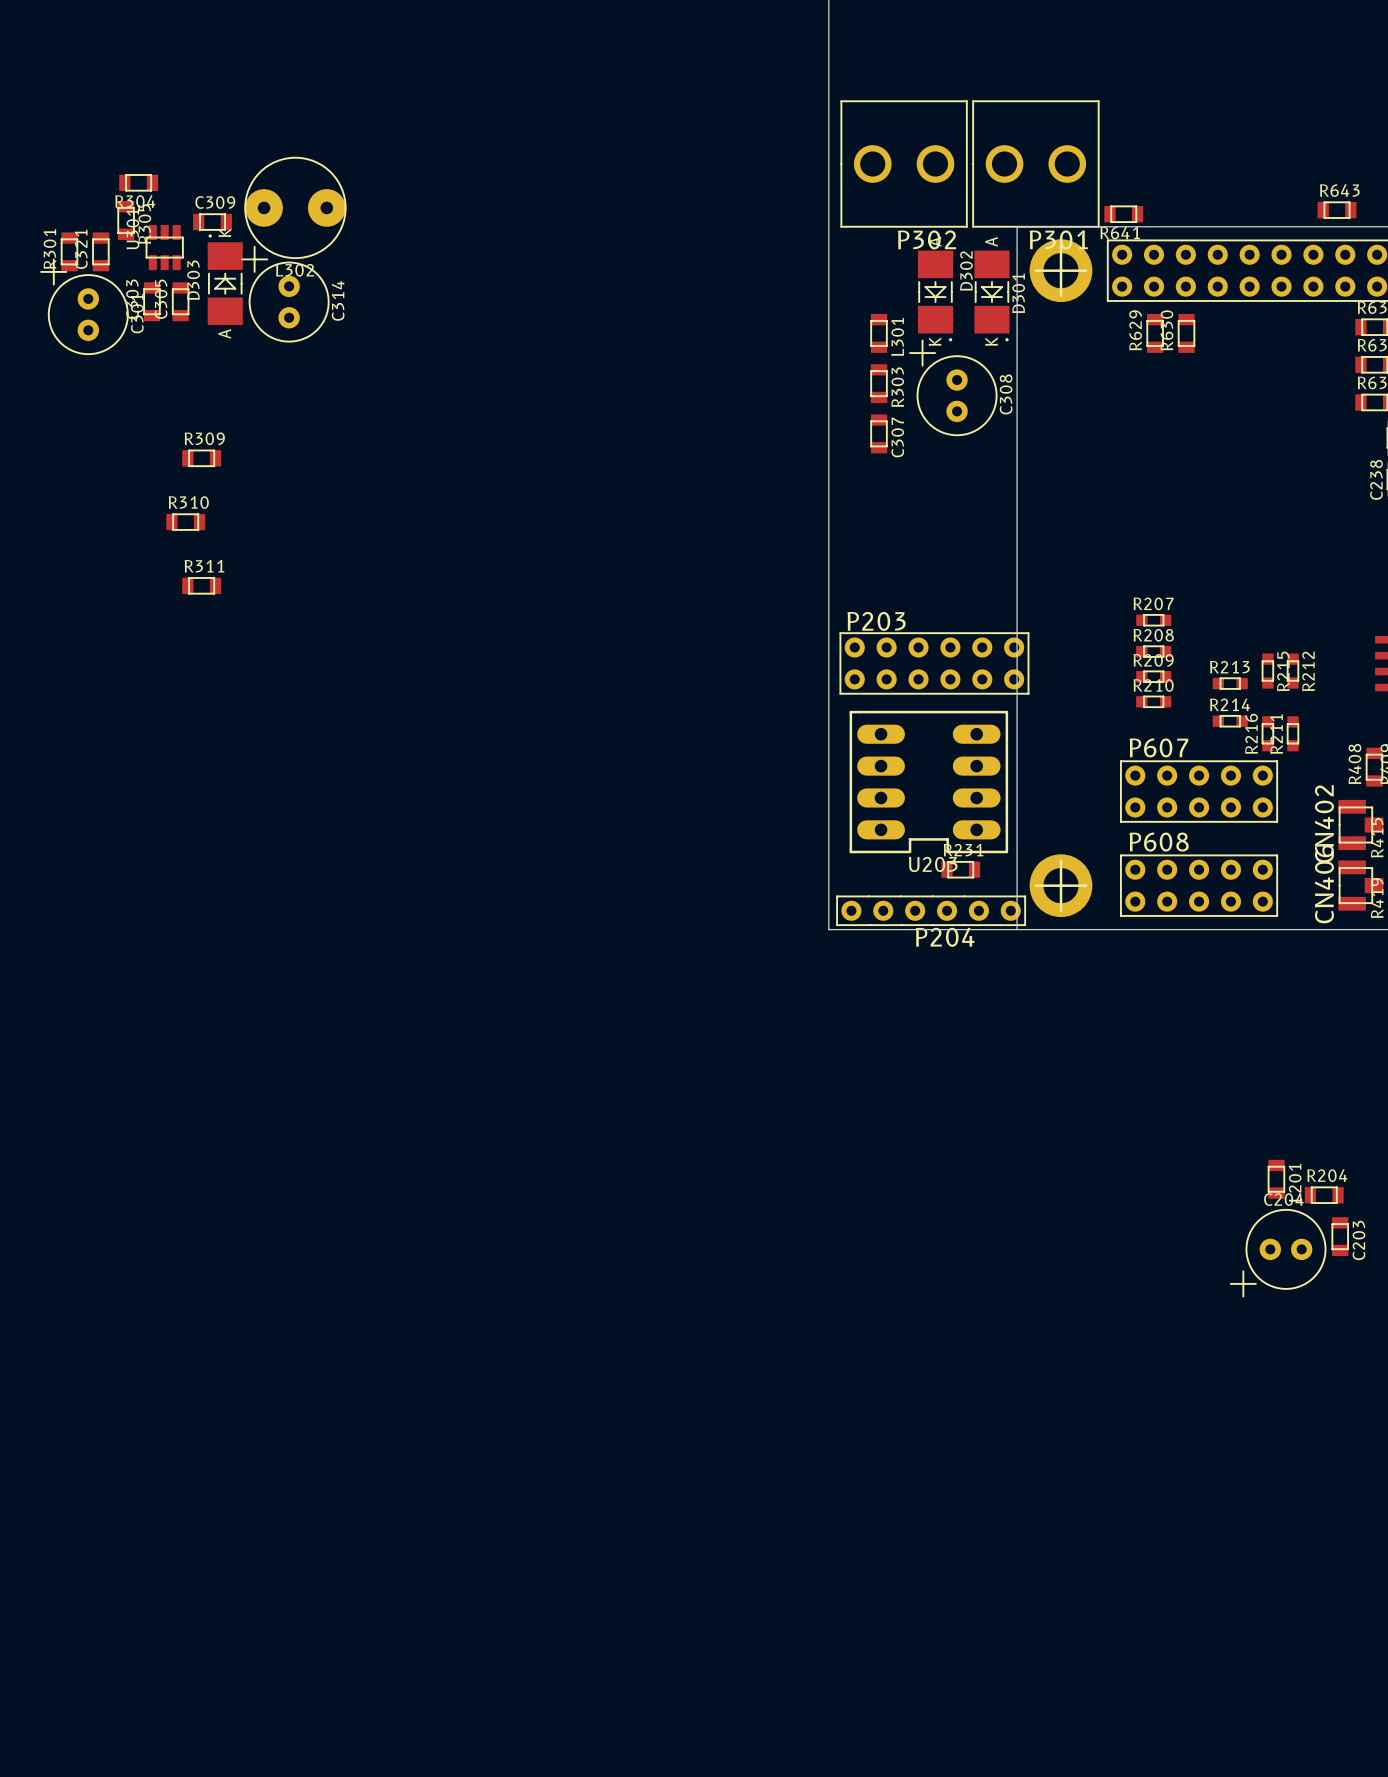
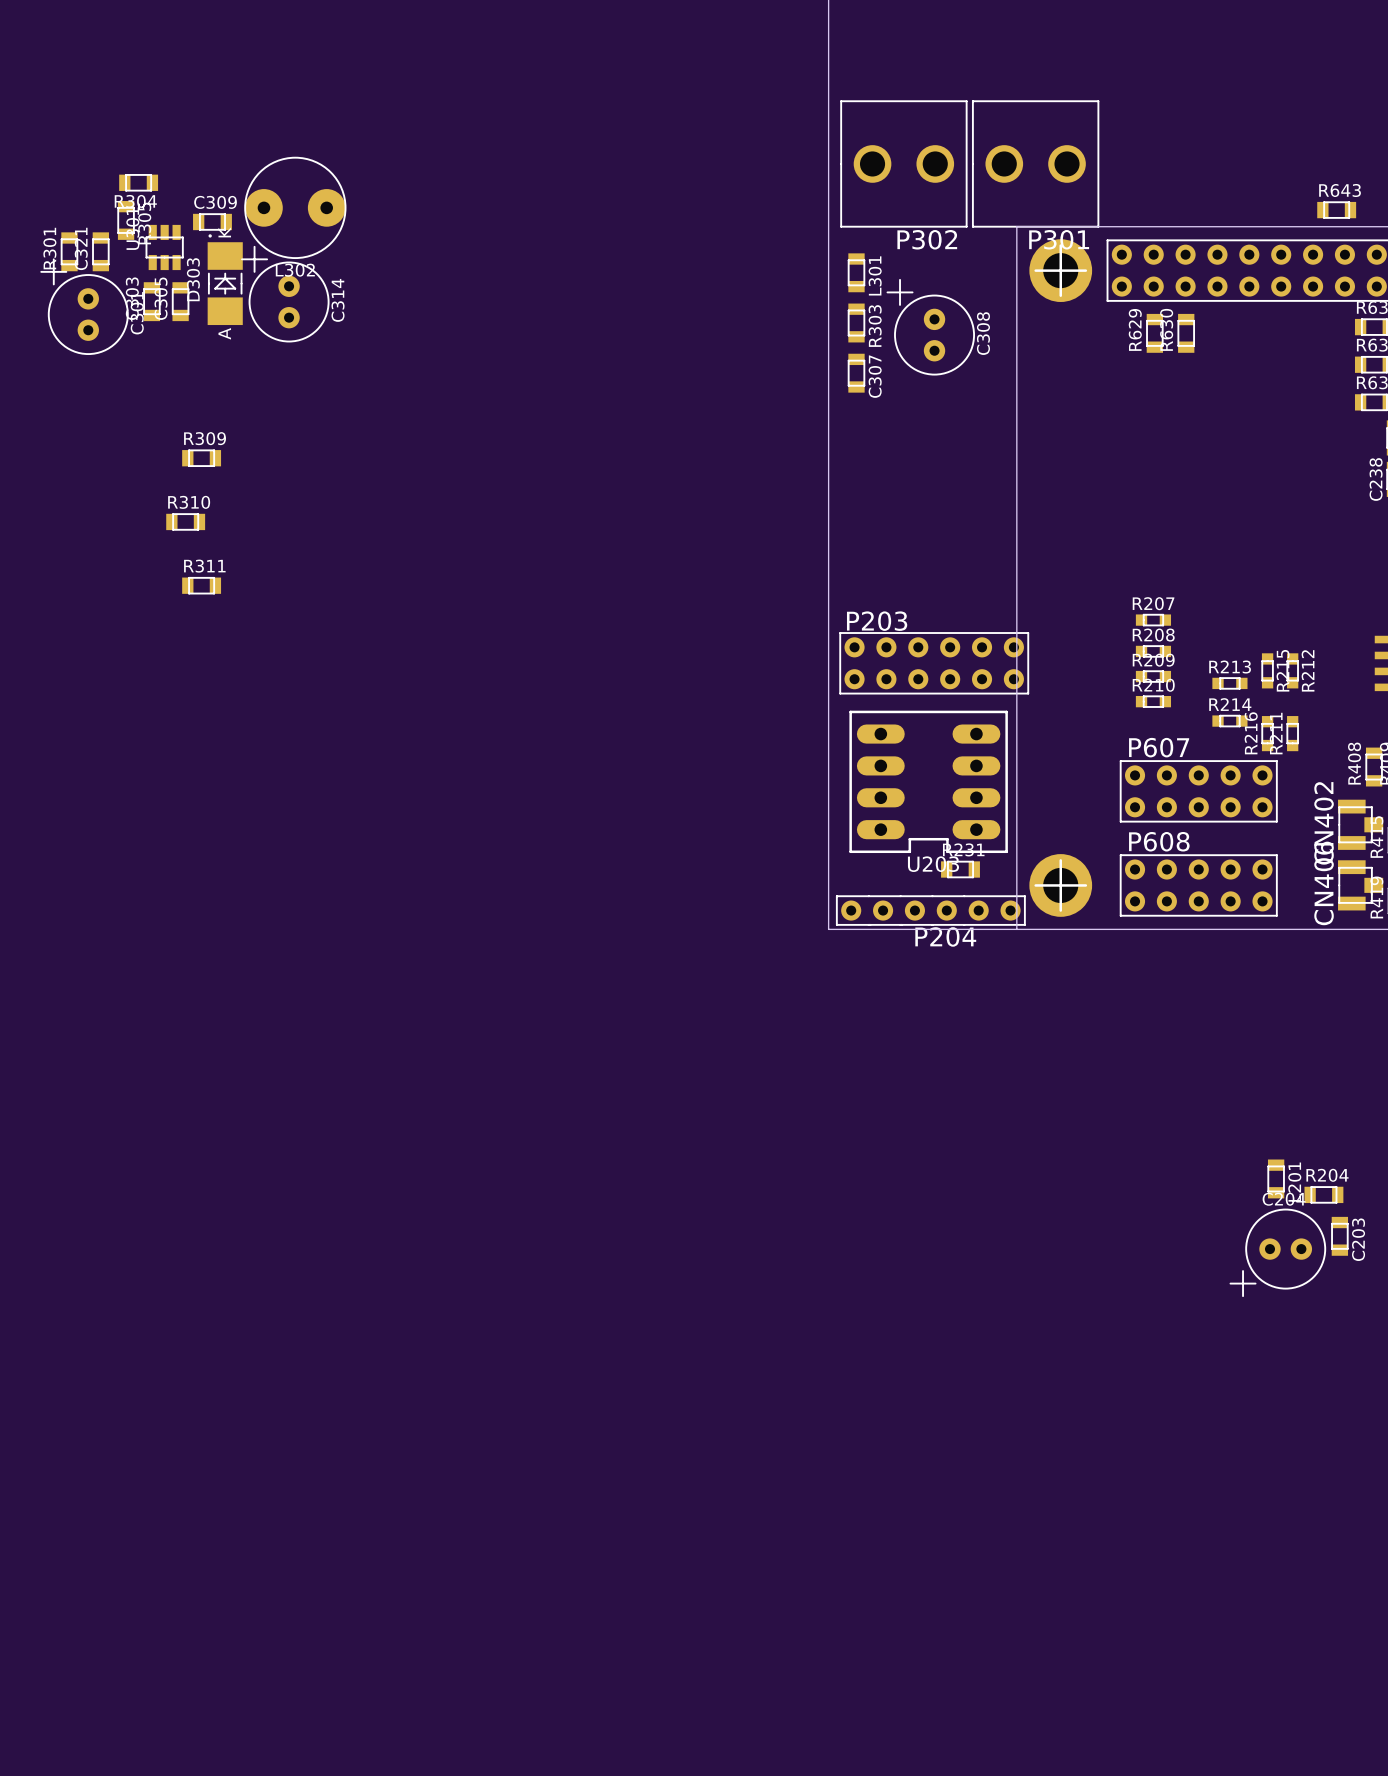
R641: (1123, 214) -> none
D302: (935, 295) -> none
D301: (991, 295) -> none
L301 position: (879, 333) -> (856, 272)
R303 position: (879, 383) -> (856, 323)
C308 position: (953, 387) -> (930, 327)
C307 position: (879, 433) -> (856, 373)

